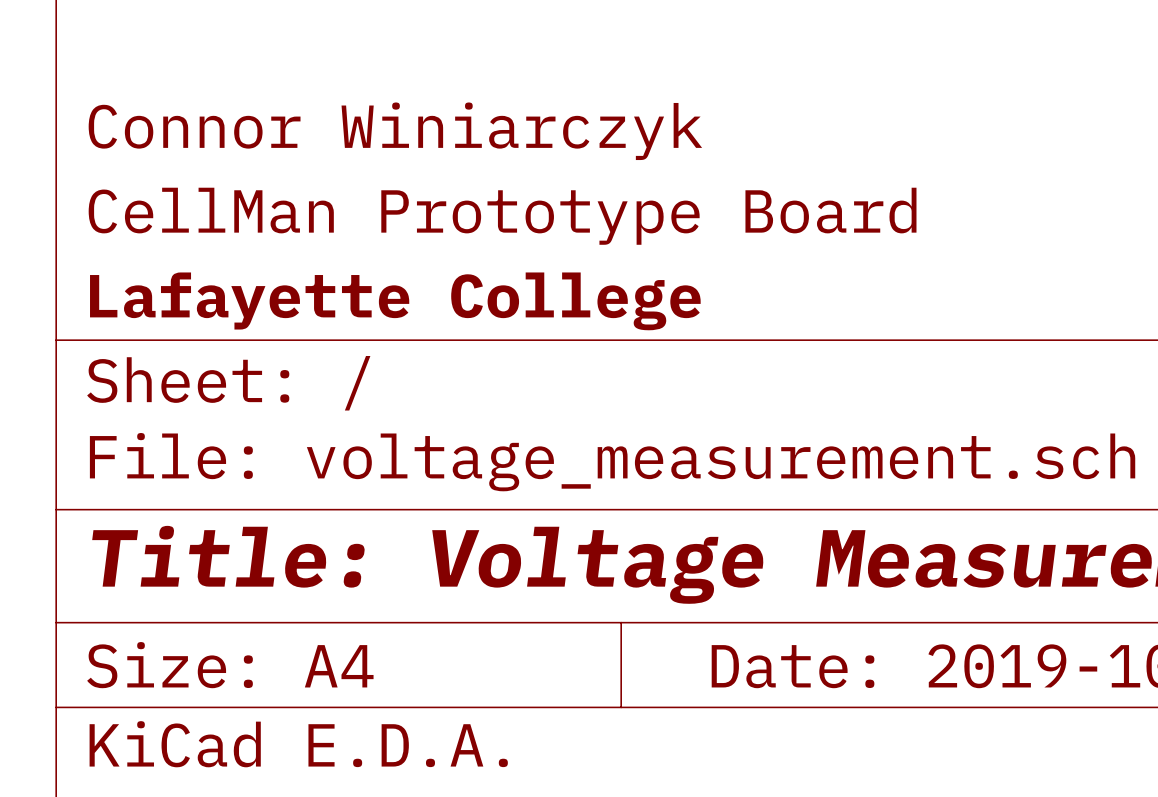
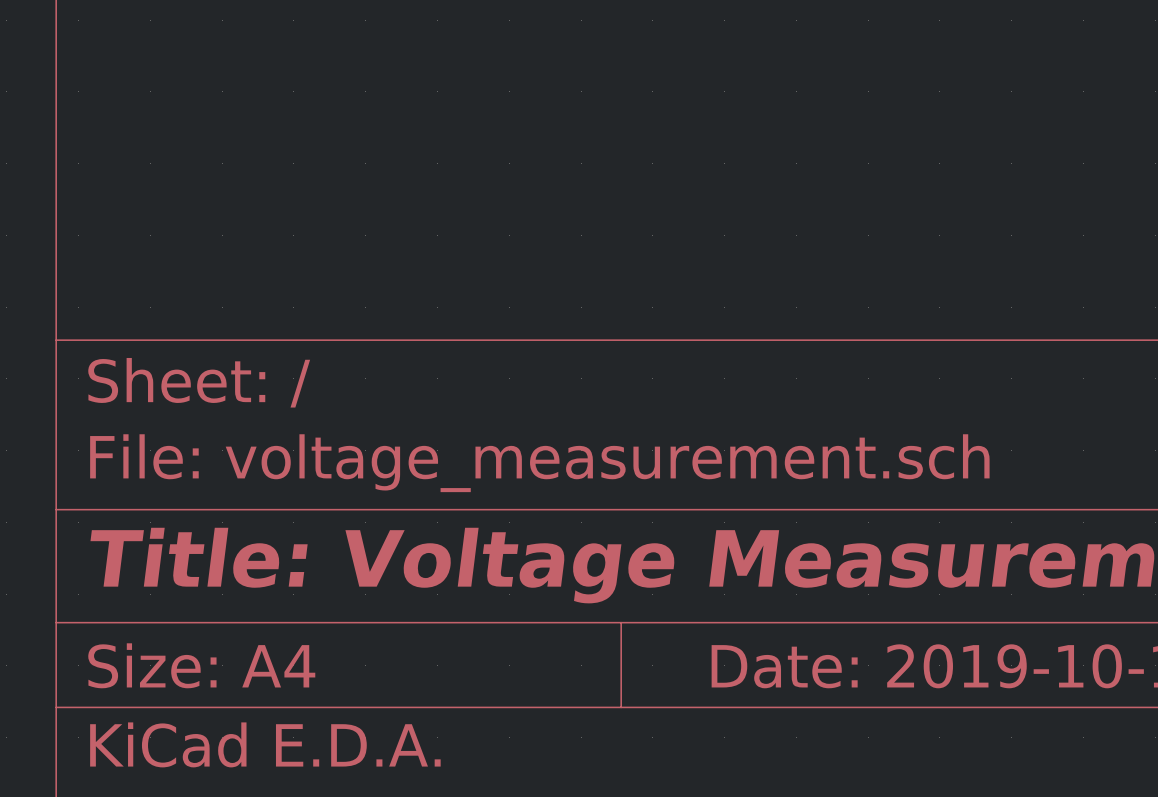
title block: Connor Winiarczyk (395, 131) -> none
title block: CellMan Prototype Board (502, 216) -> none
title block: Lafayette College (395, 301) -> none

